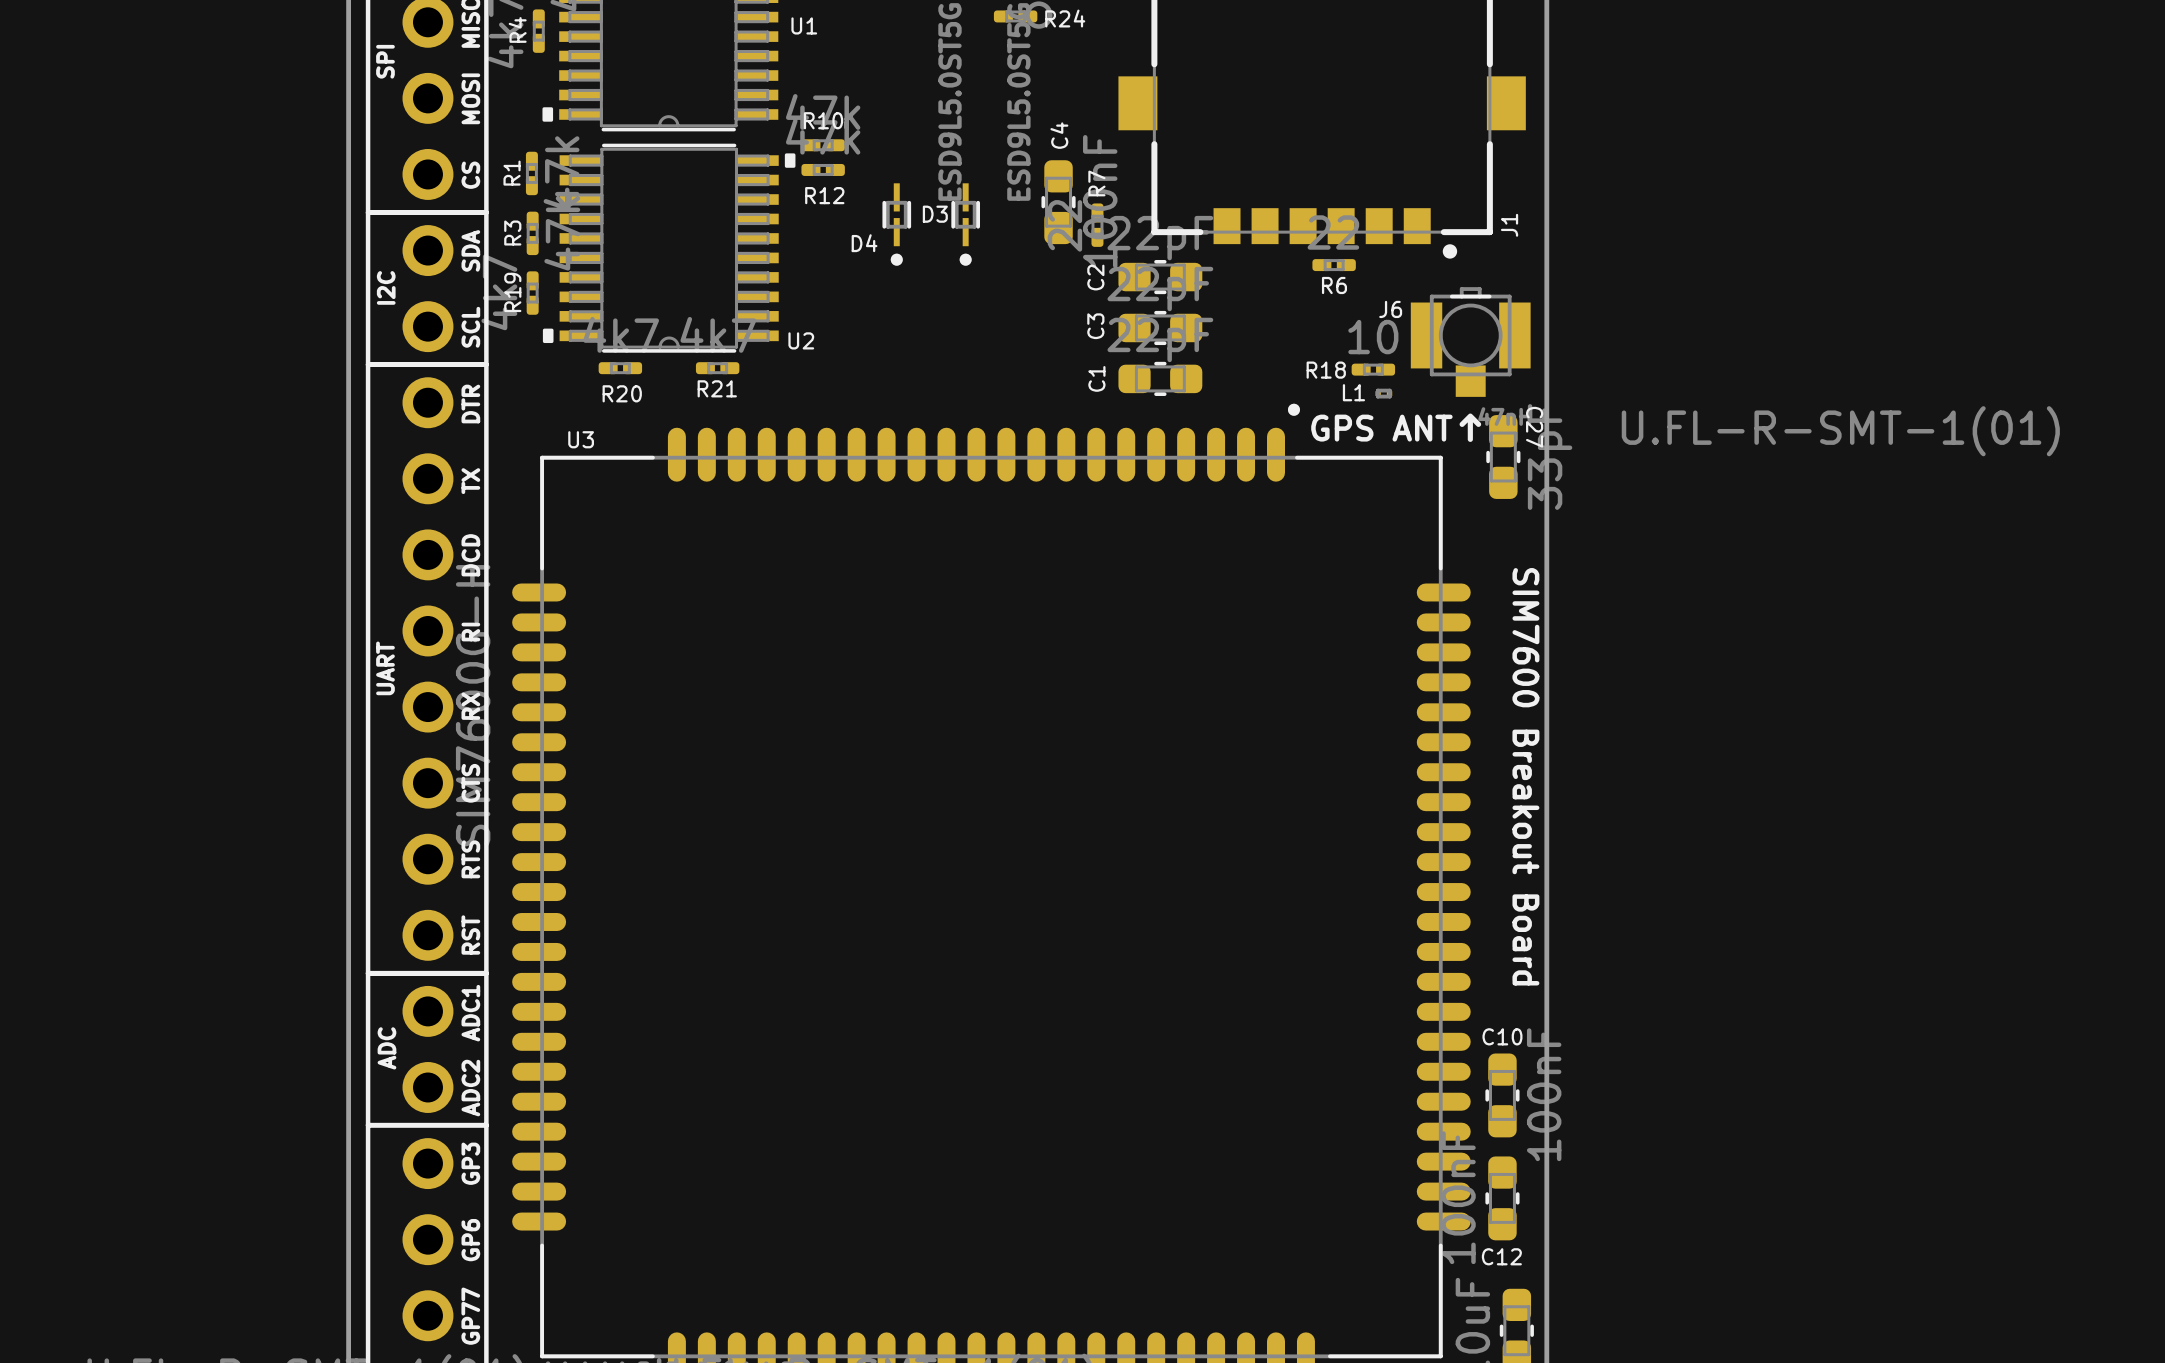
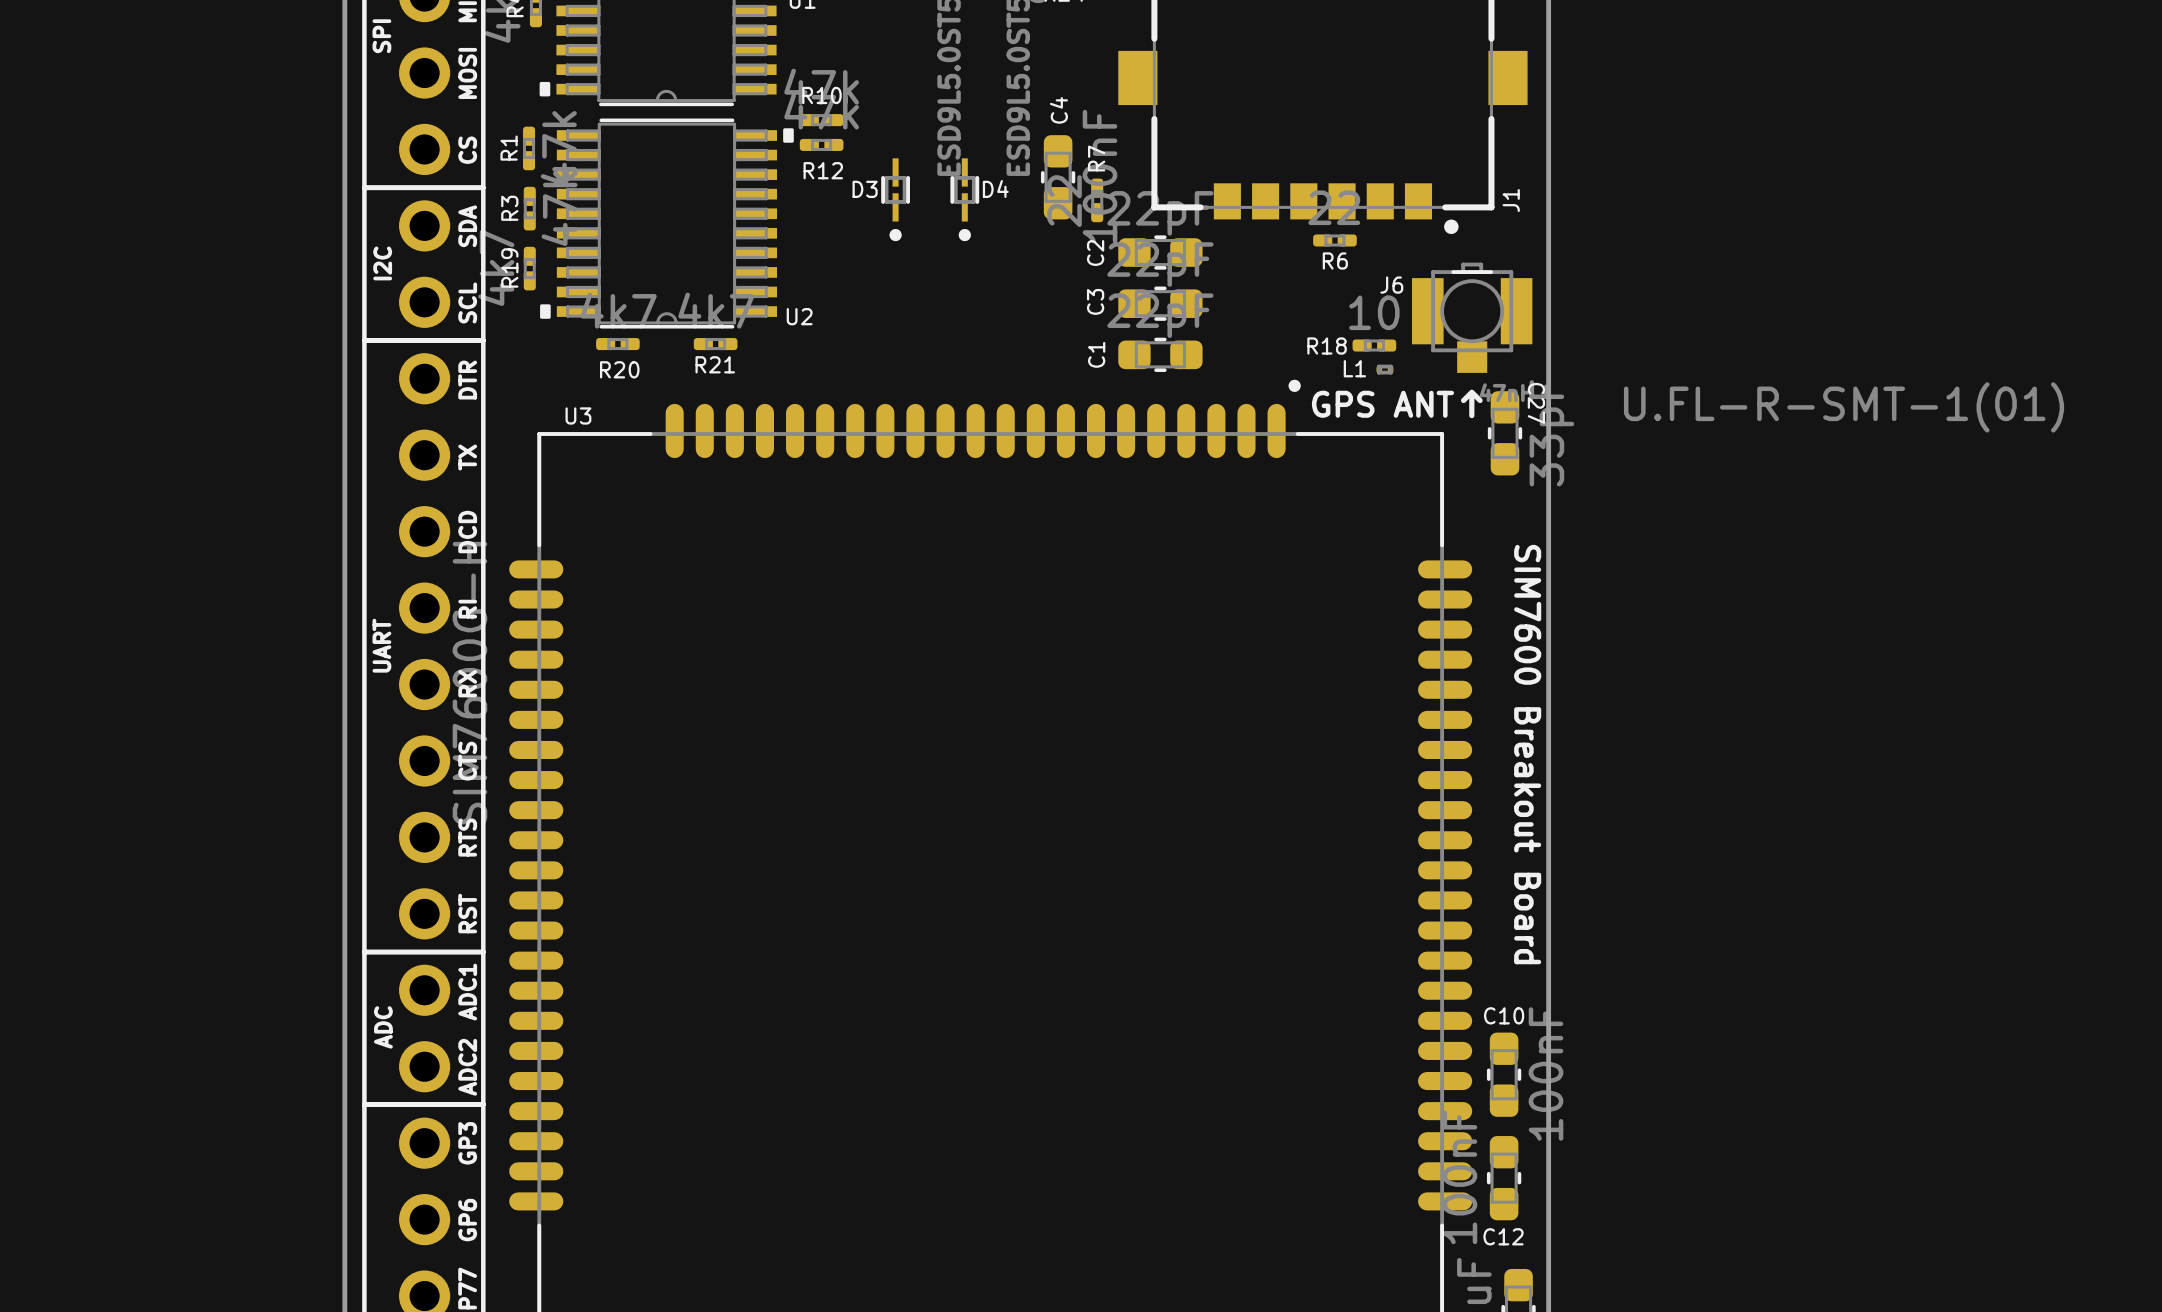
D3 name: D3 (935, 214) -> D4 (995, 189)
D4 name: D4 (864, 243) -> D3 (865, 189)

